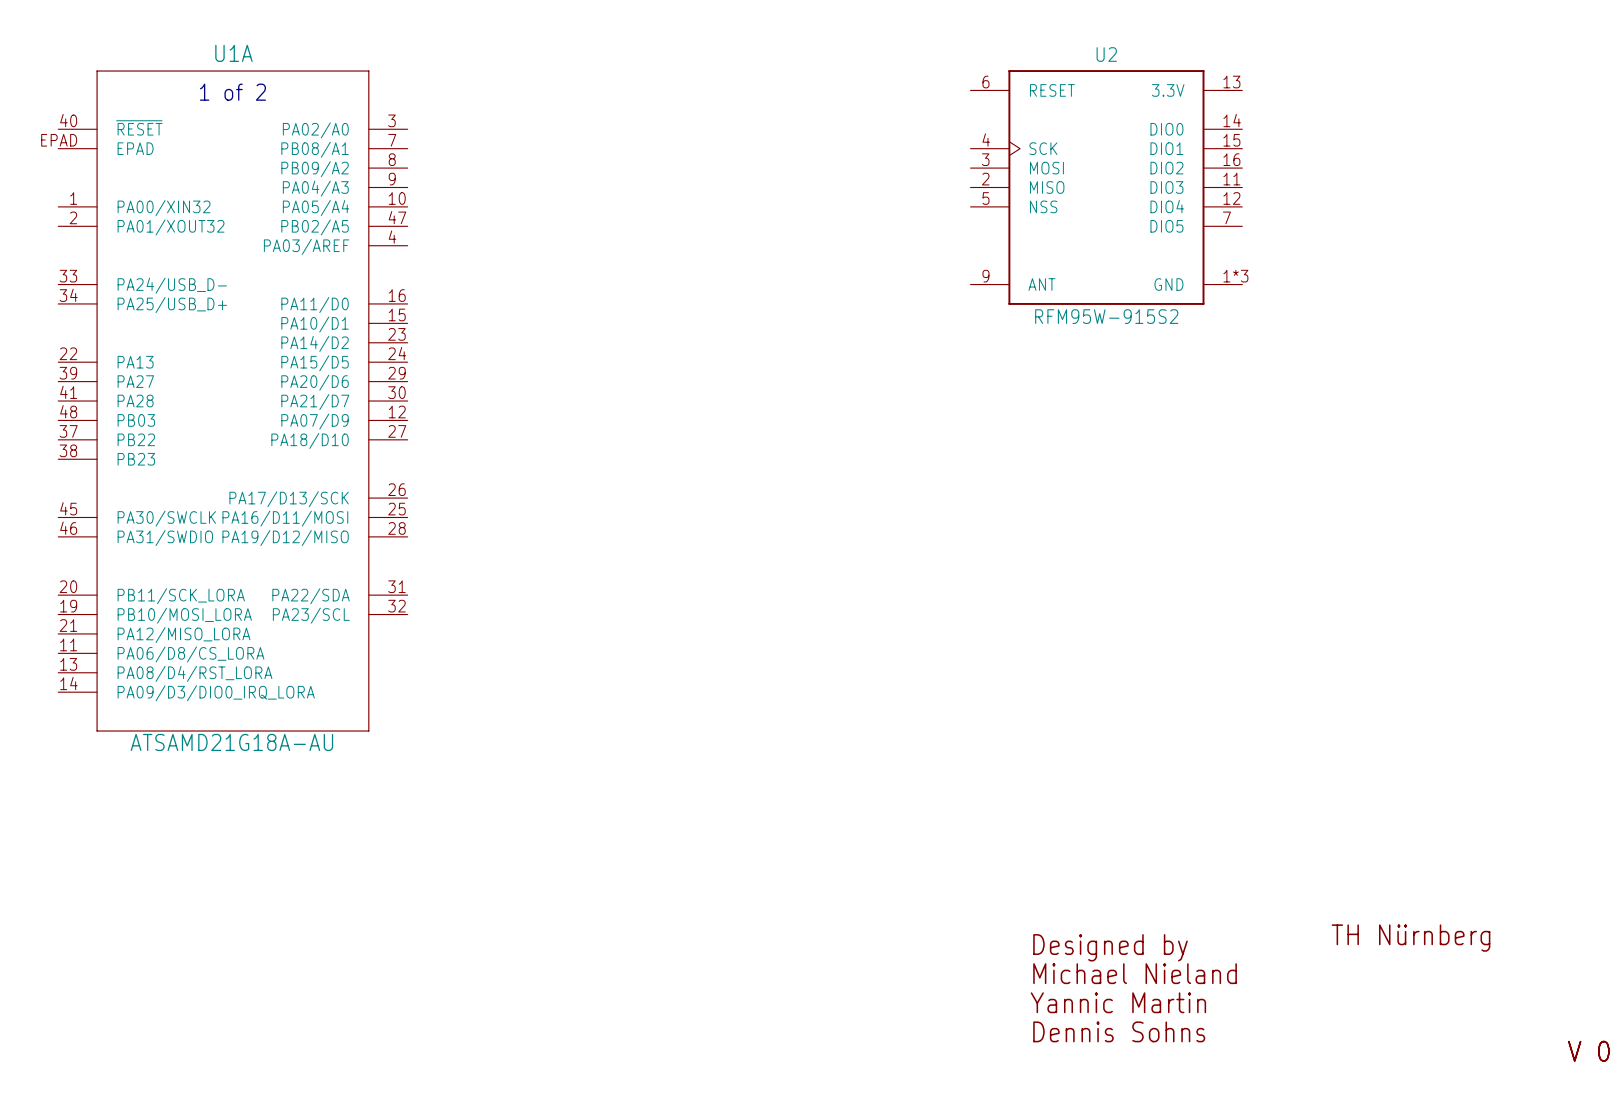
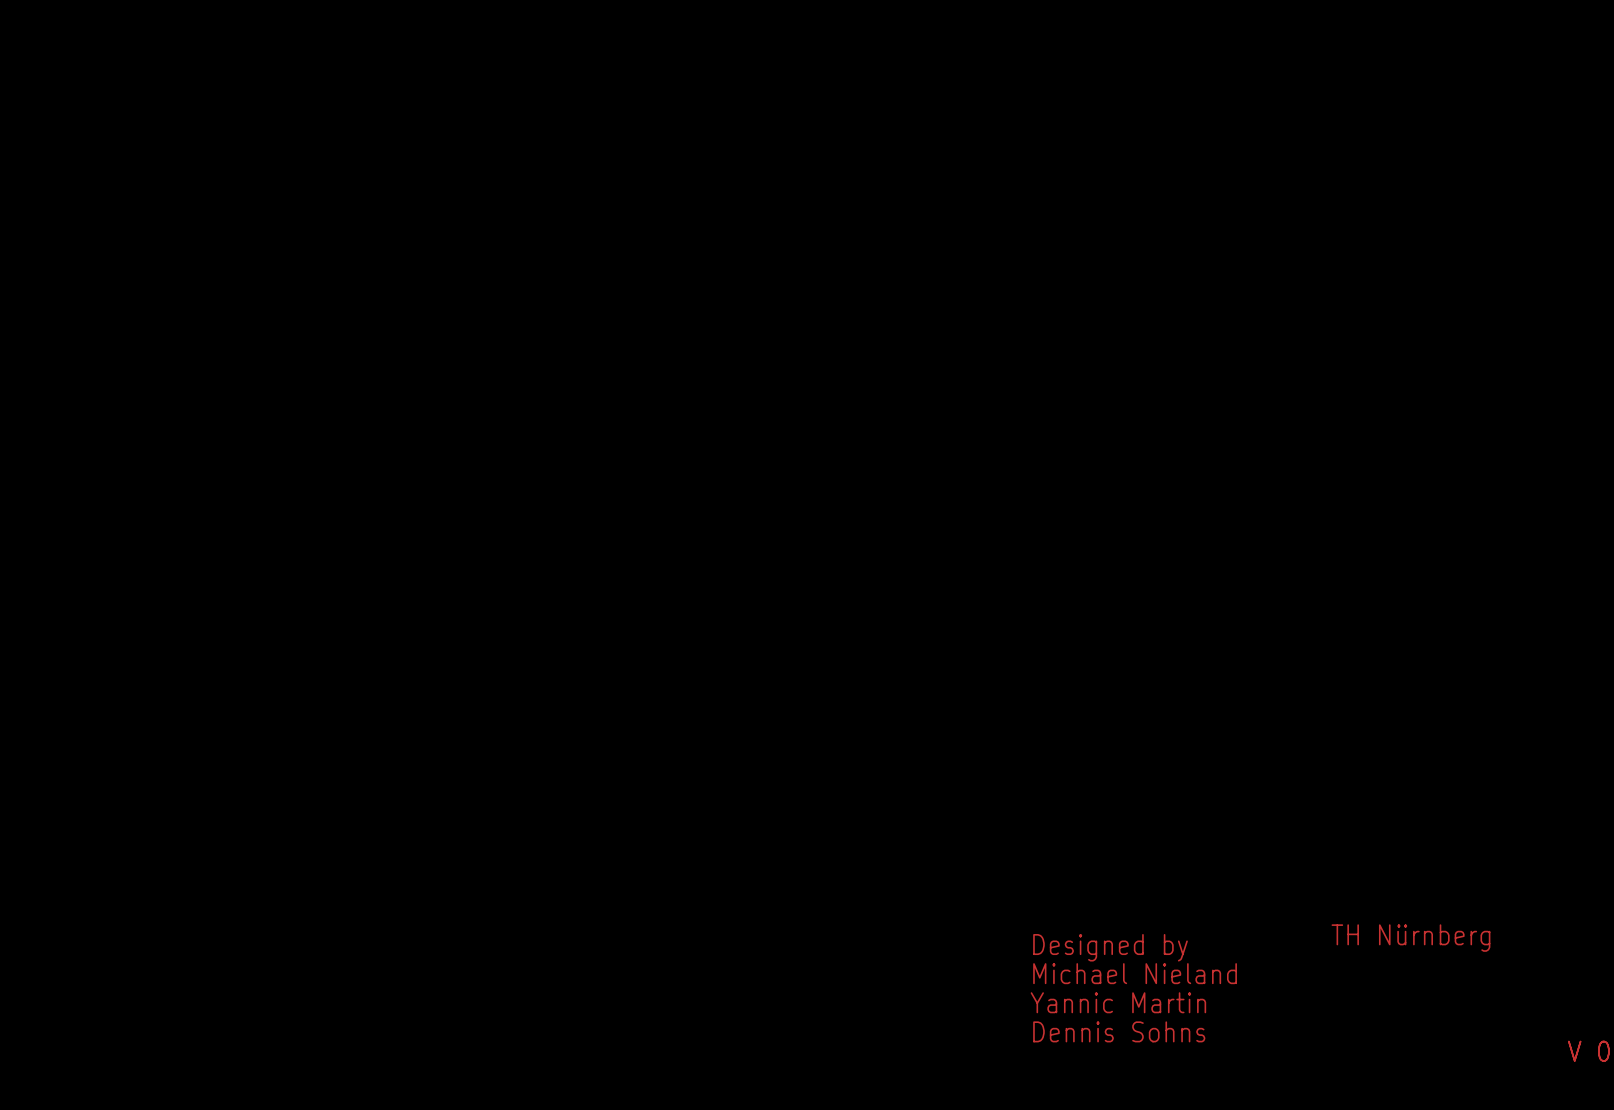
U2: RFM95W-915S2 (1106, 187) -> none
U1A: ATSAMD21G18A-AU (232, 401) -> none

